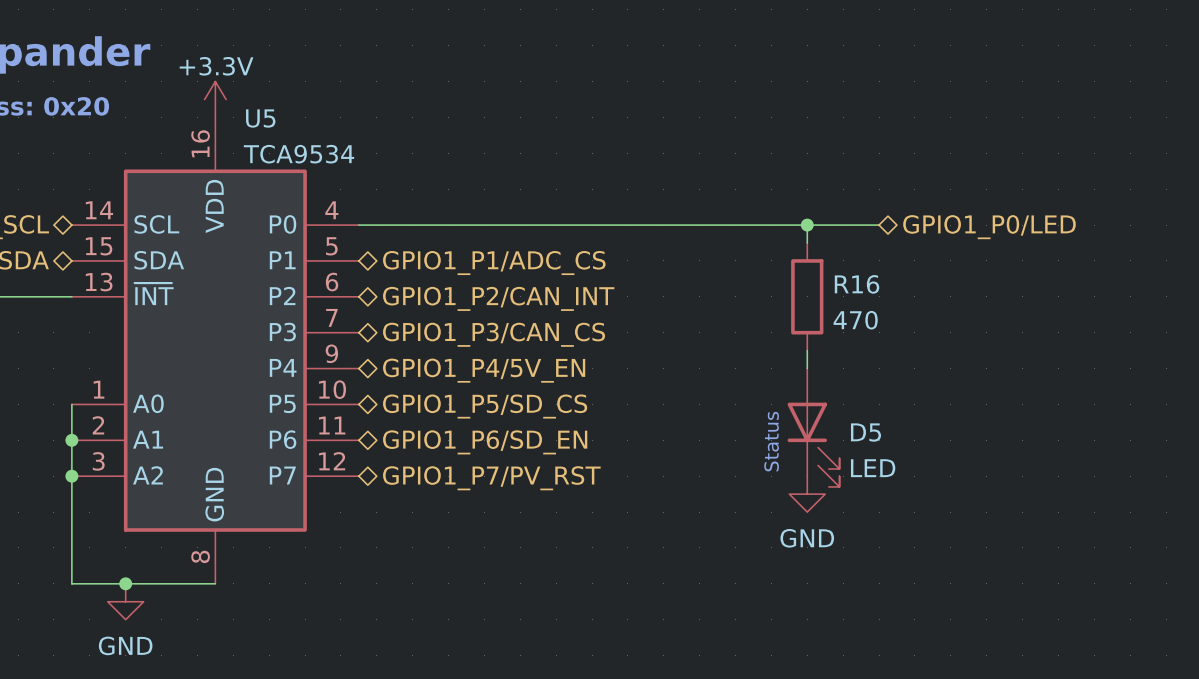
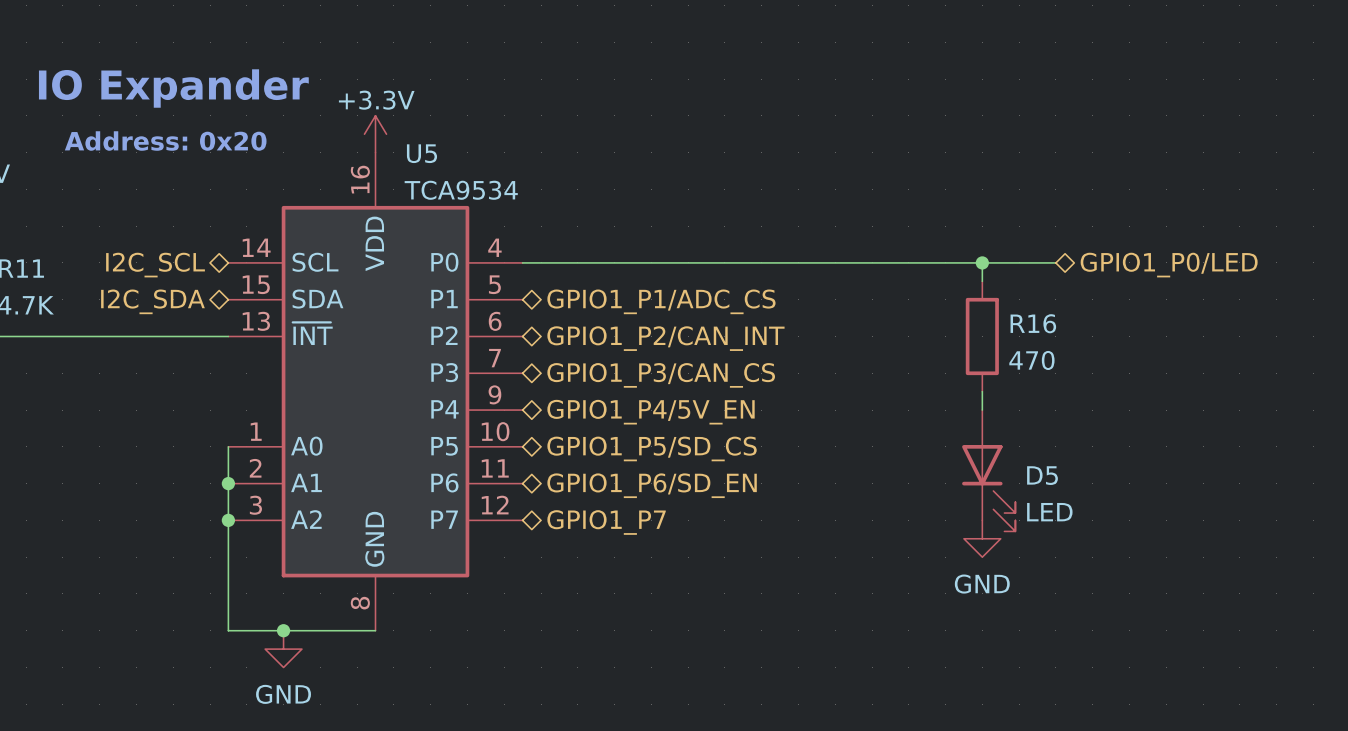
text: Status (771, 441) -> none
hierarchical label: GPIO1_P7/PV_RST (491, 478) -> GPIO1_P7 (606, 522)

